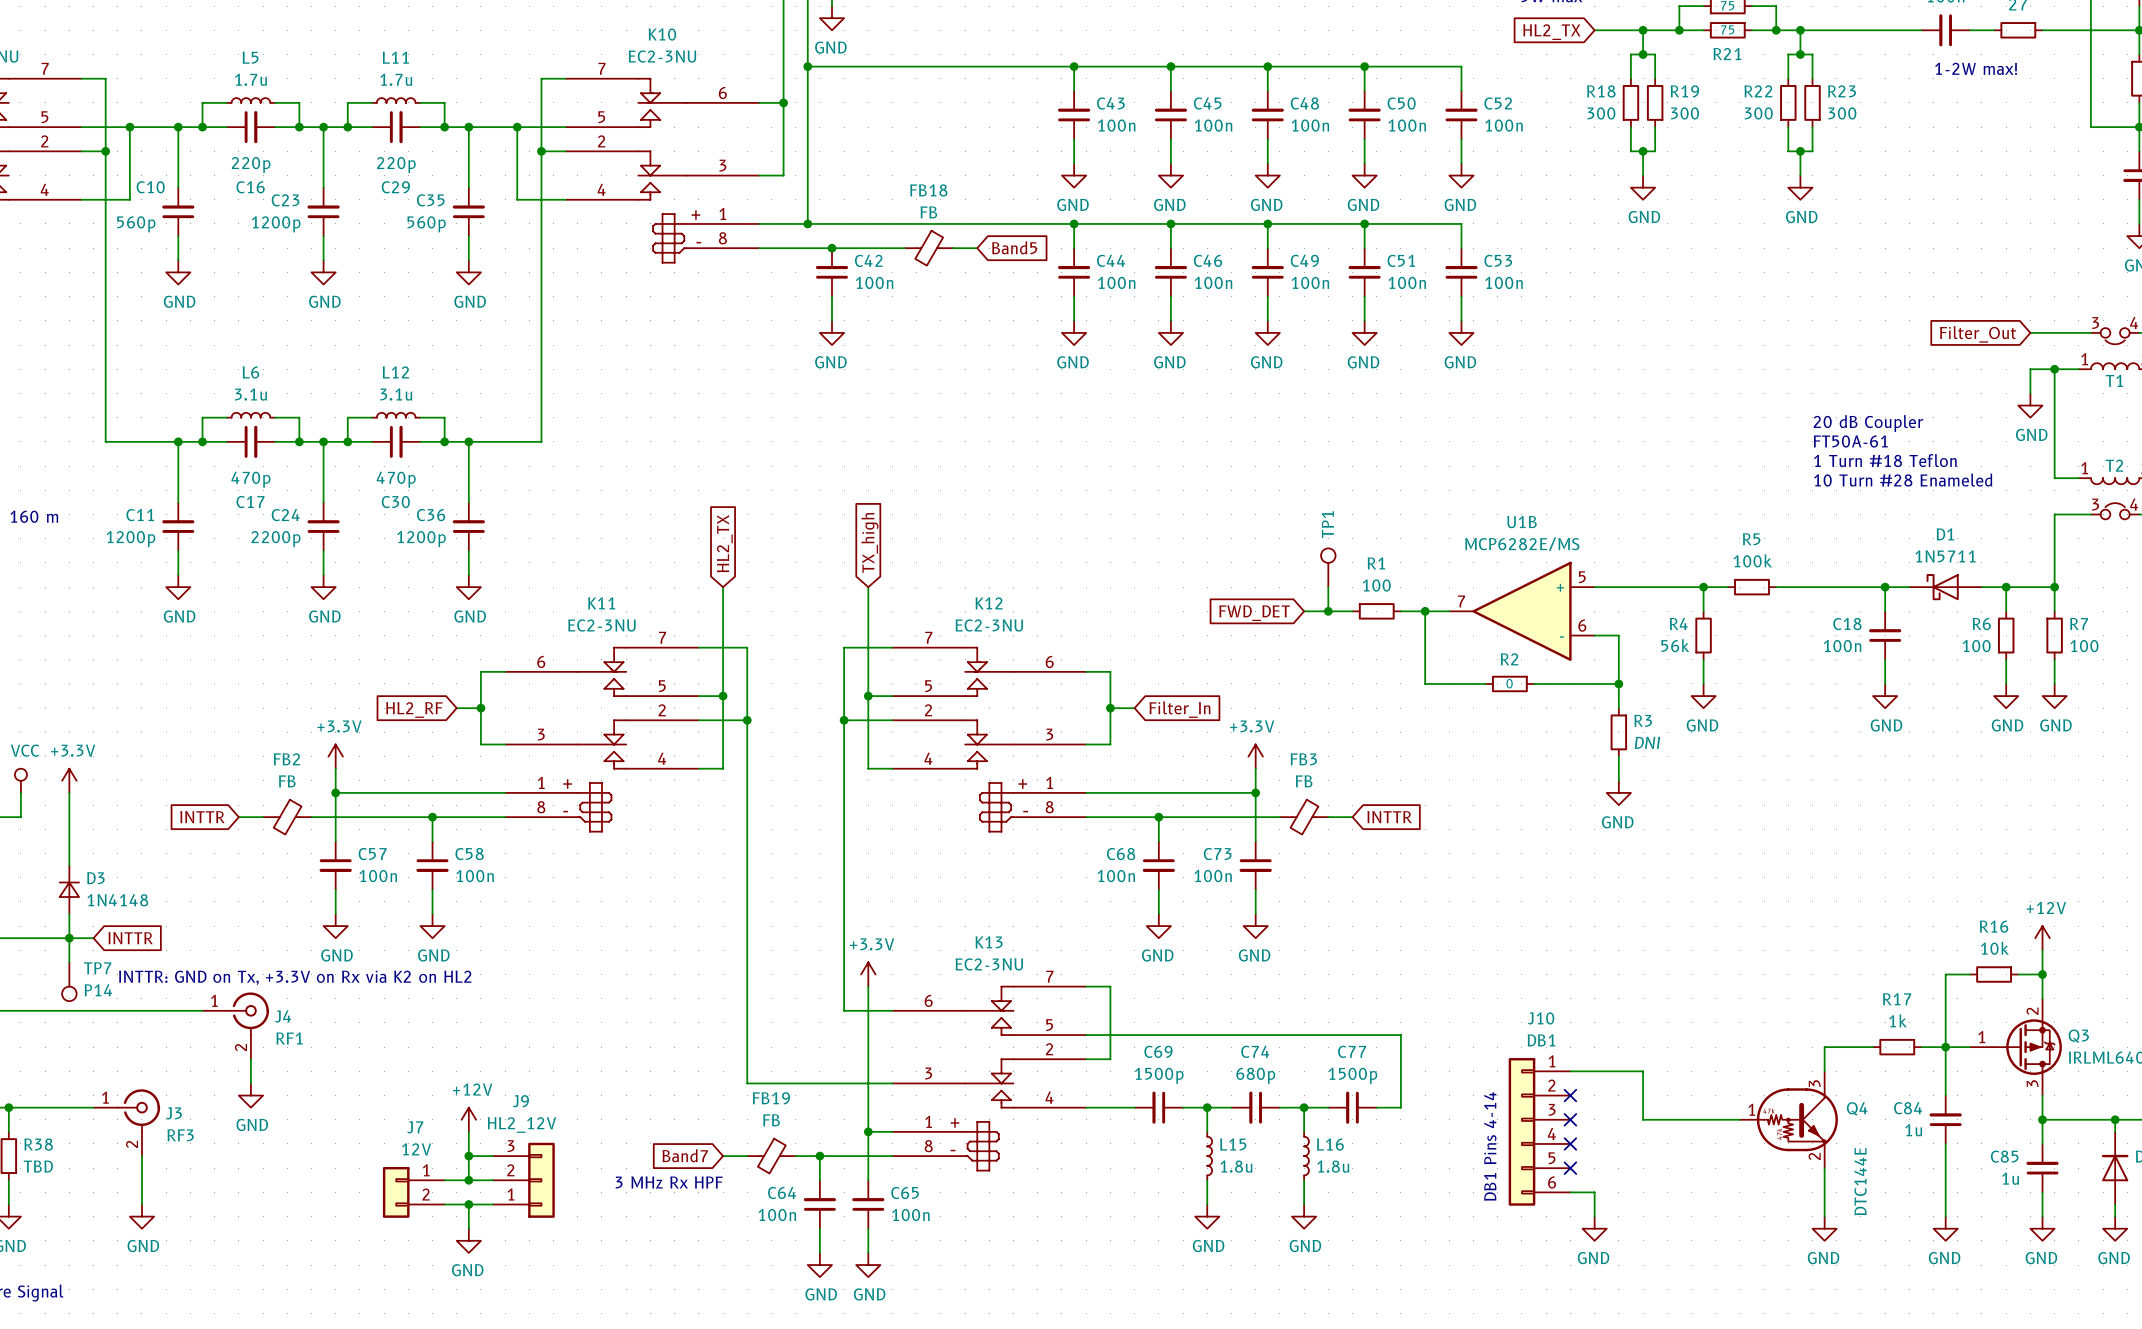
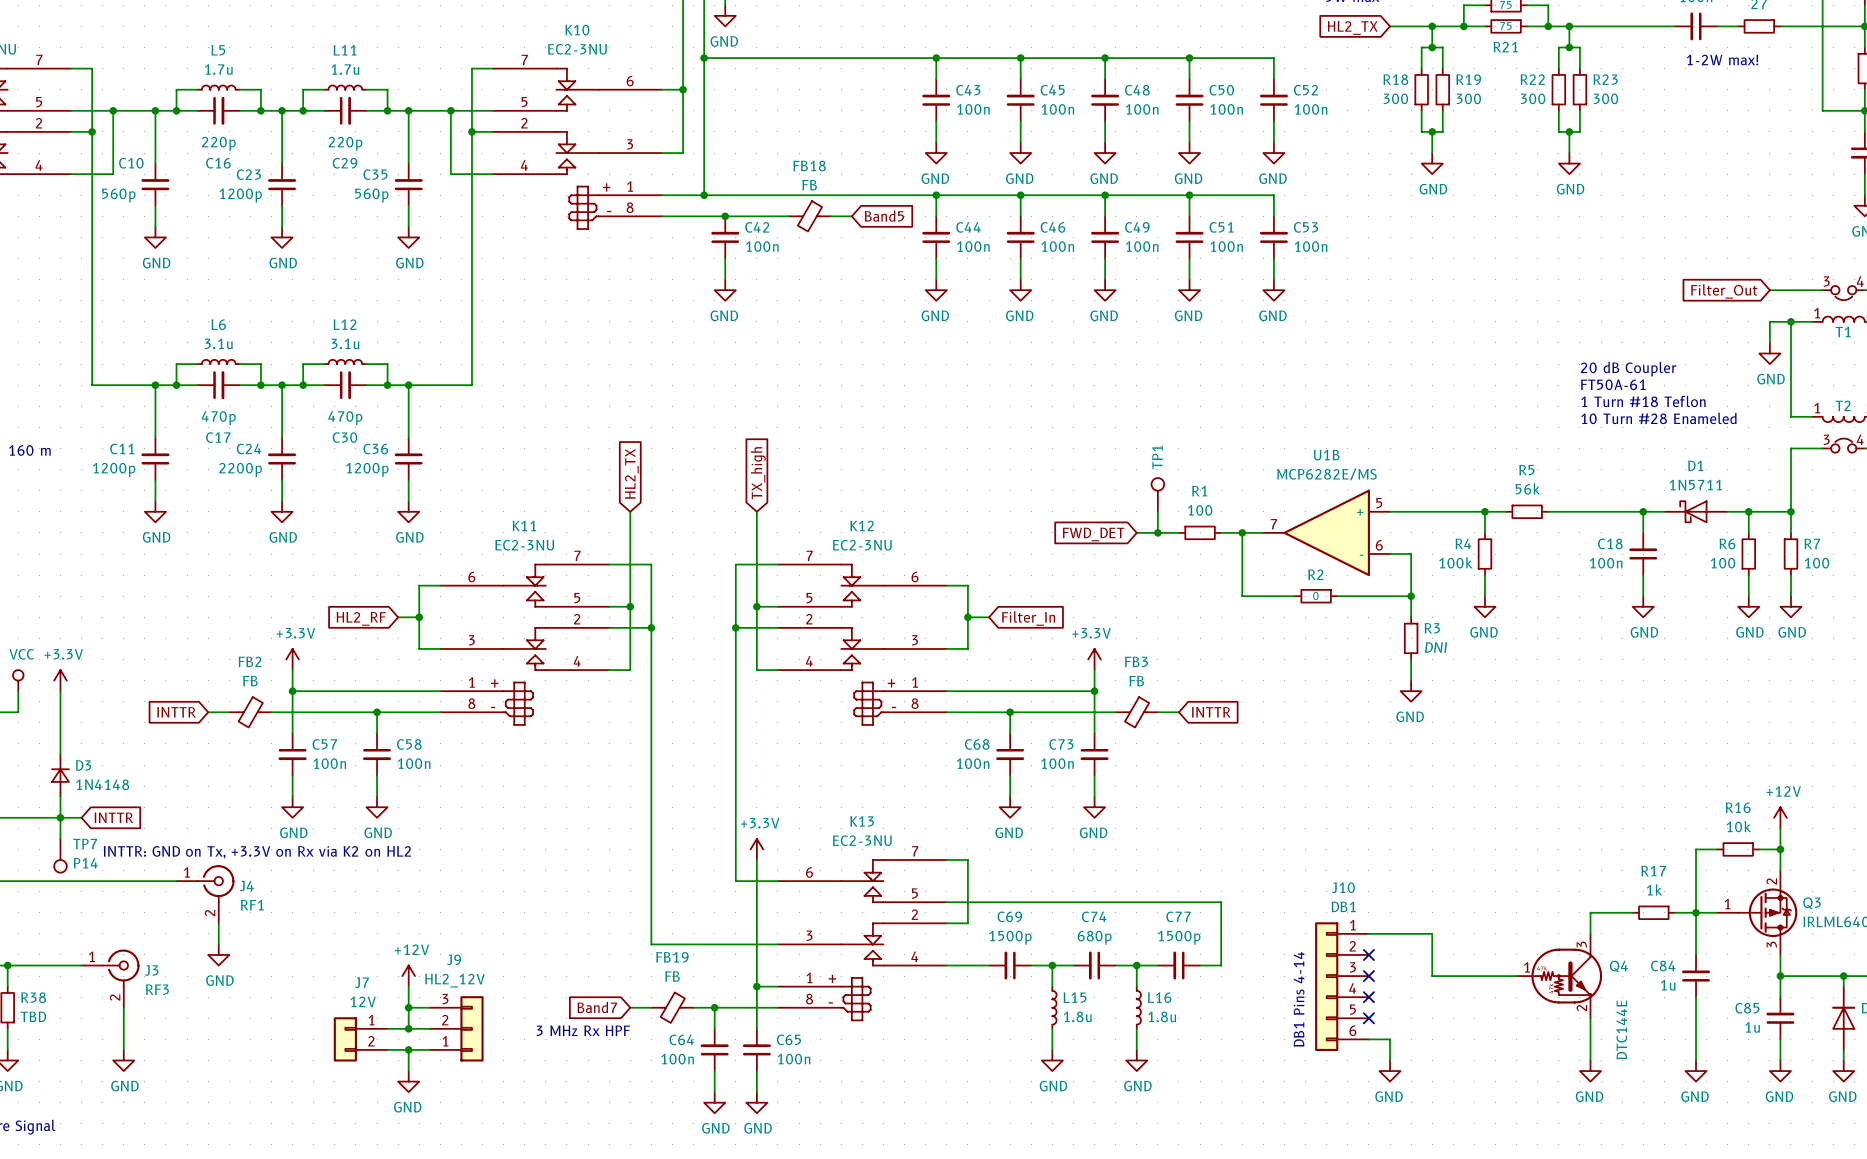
R5 value: 100k (1752, 560) -> 56k (1527, 488)
R4 value: 56k (1675, 645) -> 100k (1455, 562)

